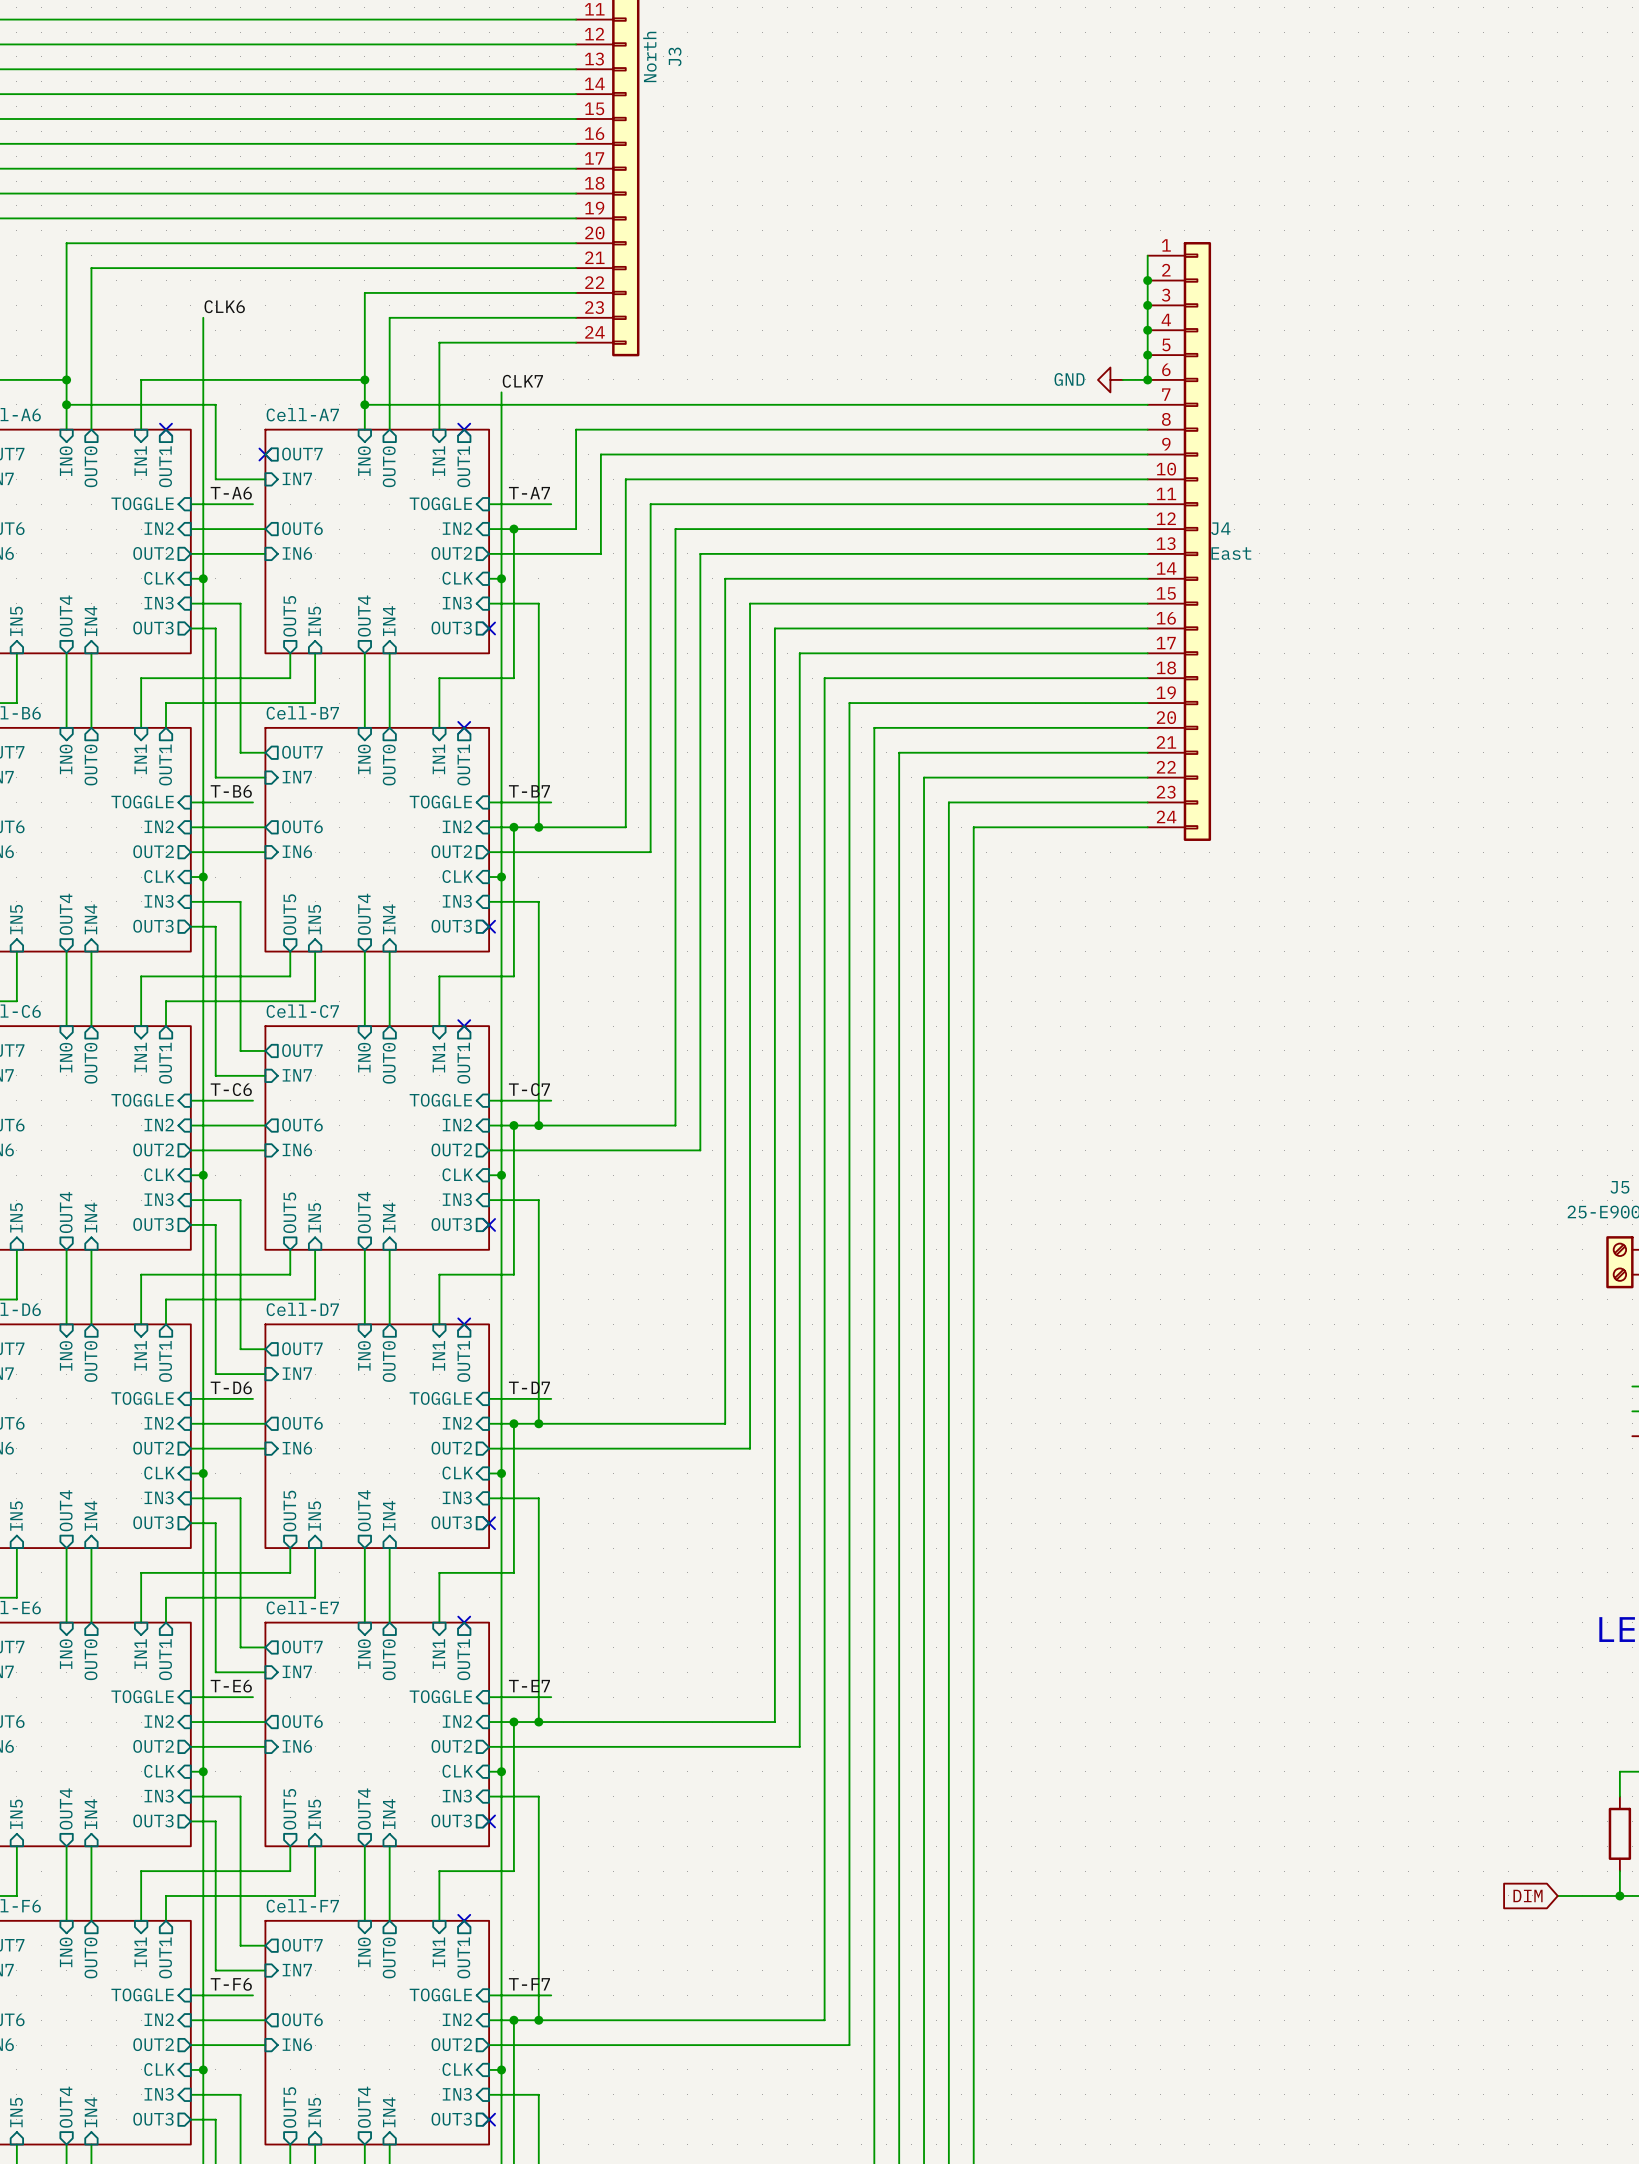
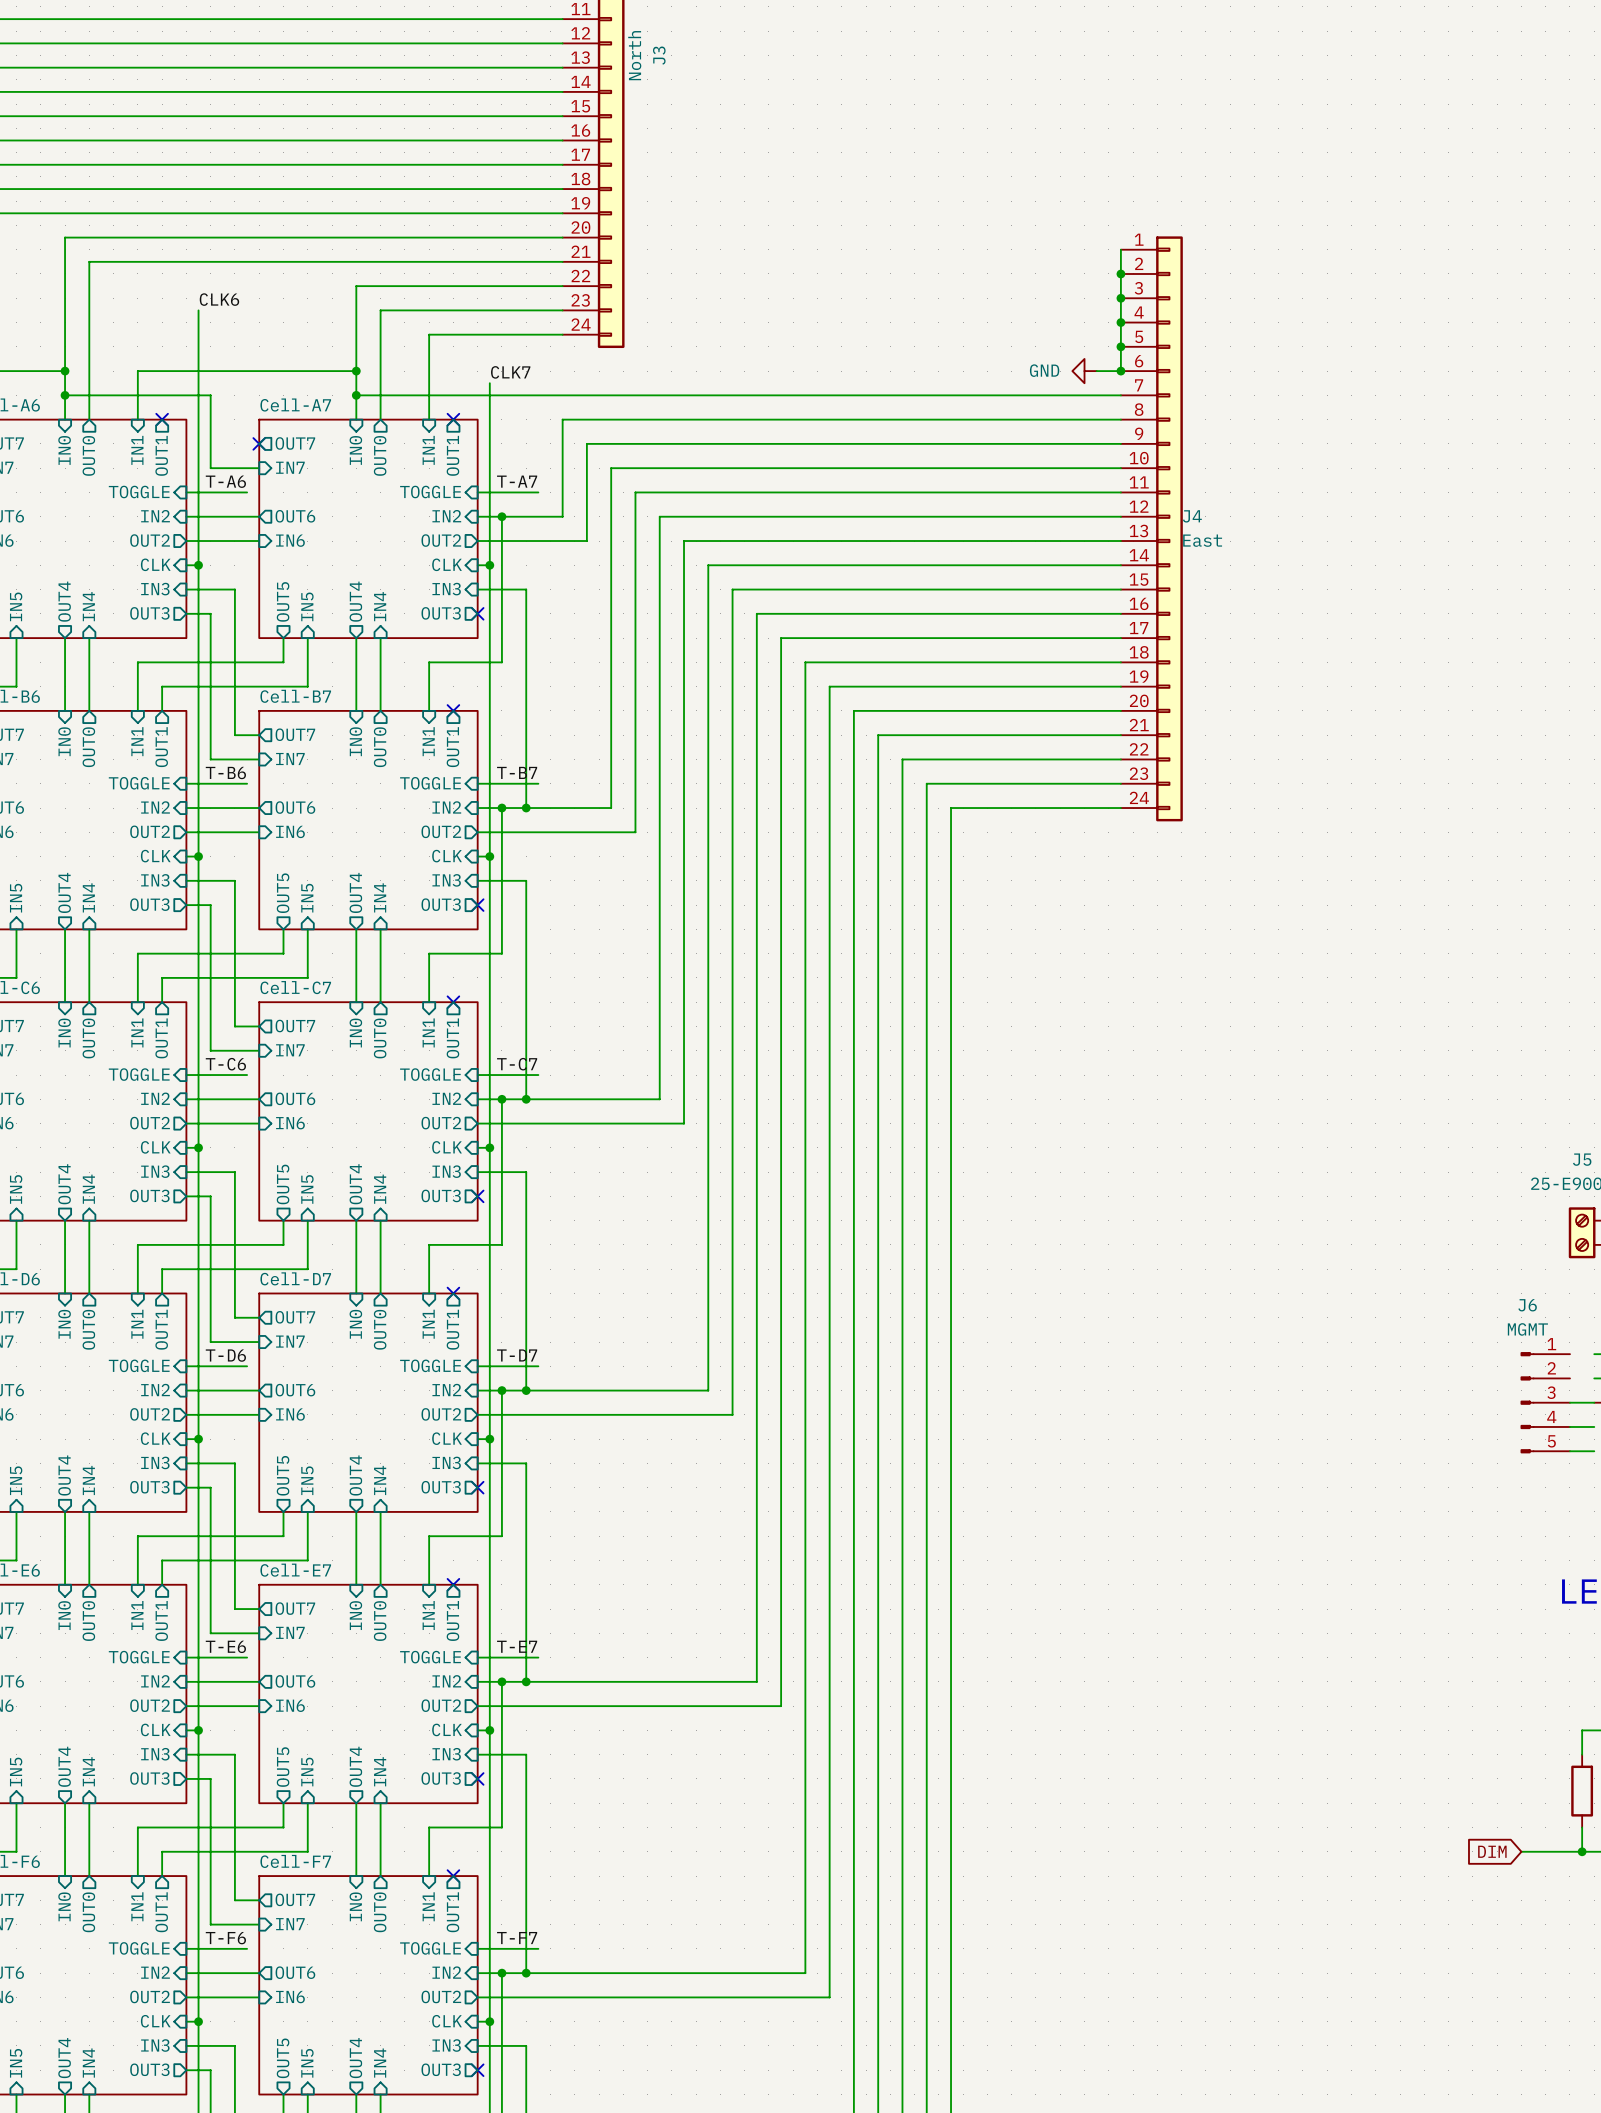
J6: none -> MGMT (1545, 1402)
wire: none -> (1569, 1402) (1594, 1402)
wire: none -> (1569, 1426) (1594, 1426)
wire: none -> (1569, 1451) (1594, 1451)

